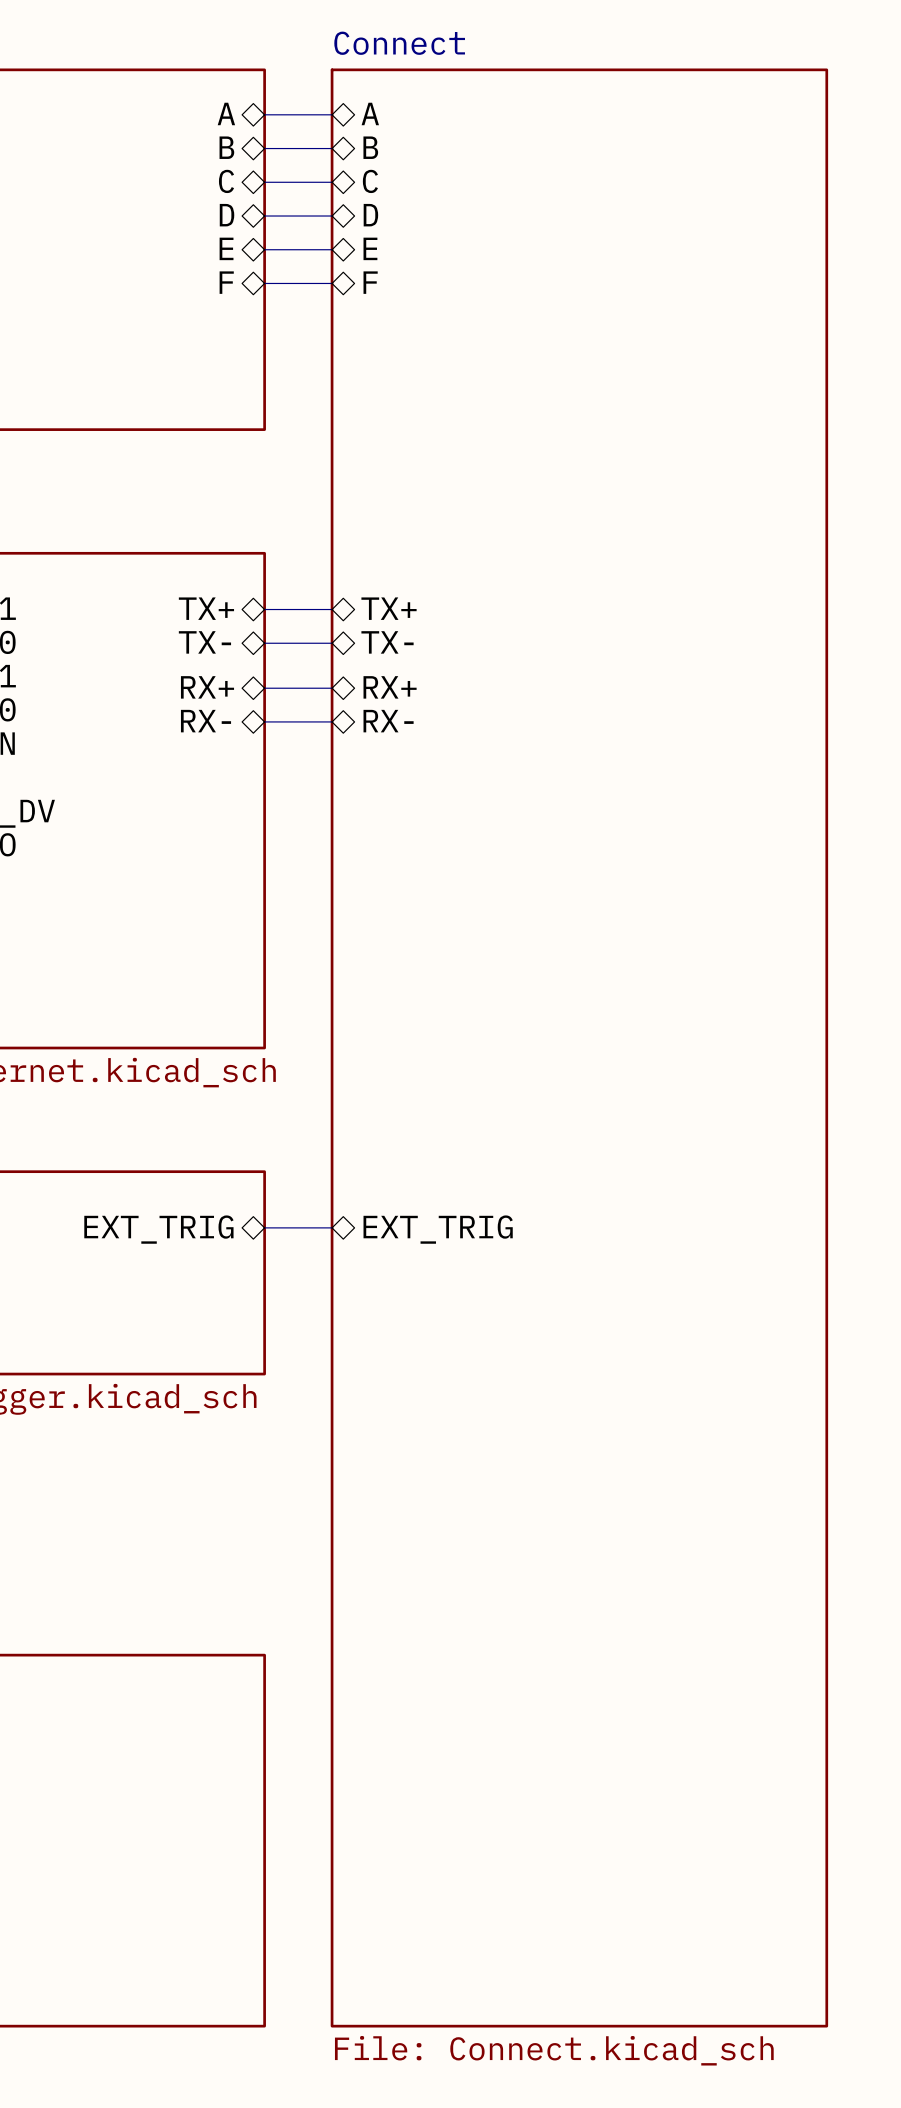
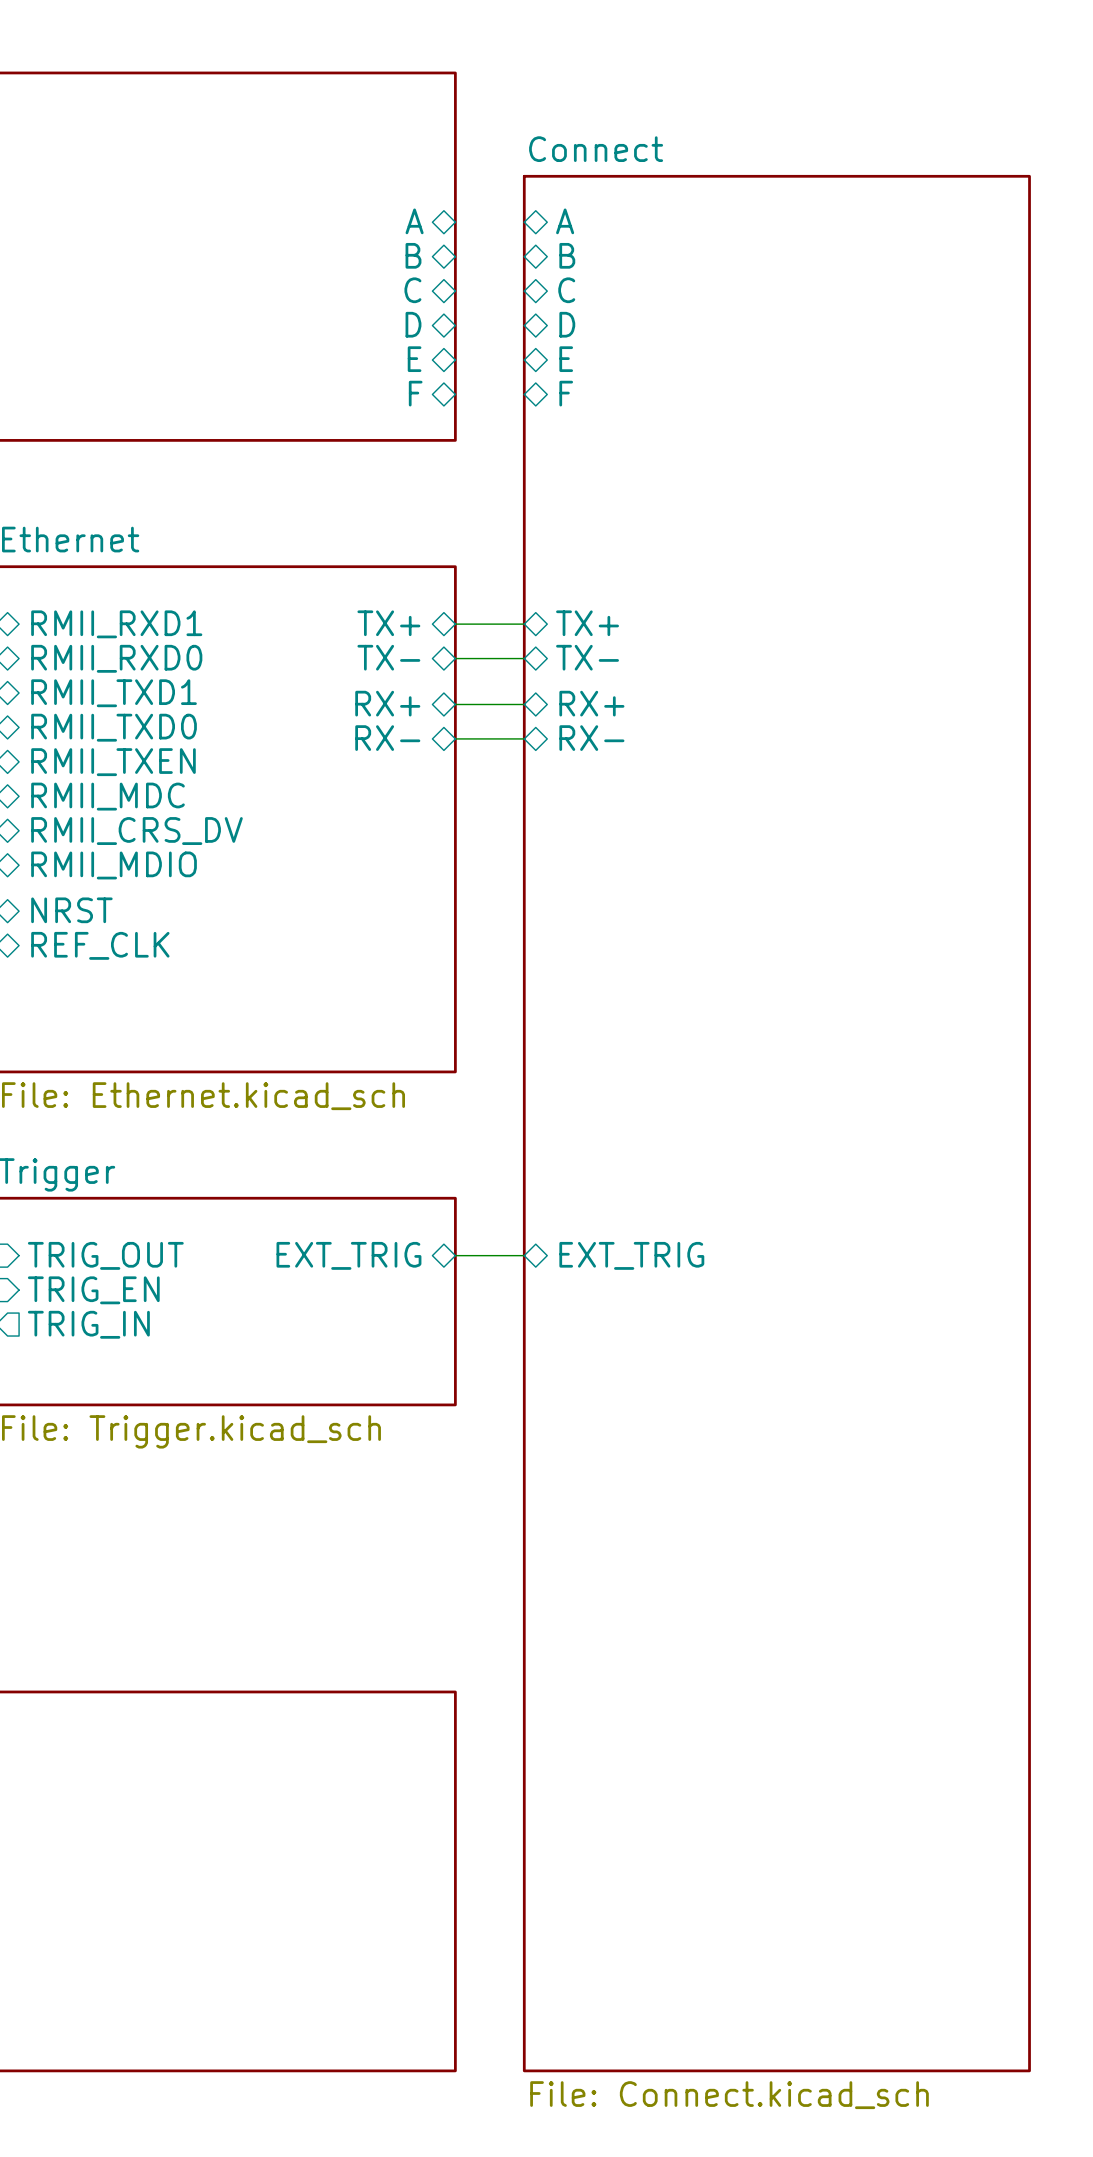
sheet pin: A (226, 113) -> none
sheet pin: A (370, 113) -> none
wire: (264, 114) (332, 114) -> none
sheet pin: B (226, 147) -> none
sheet pin: B (370, 147) -> none
wire: (264, 148) (332, 148) -> none
sheet pin: C (226, 181) -> none
sheet pin: C (370, 181) -> none
wire: (264, 182) (332, 182) -> none
sheet pin: D (227, 215) -> A (414, 221)
sheet pin: D (370, 215) -> A (565, 221)
wire: (264, 216) (332, 216) -> none
sheet pin: E (226, 248) -> B (413, 255)
sheet pin: E (370, 248) -> B (567, 255)
wire: (264, 249) (332, 249) -> none
sheet pin: F (226, 282) -> C (412, 290)
sheet pin: F (370, 282) -> C (566, 290)
wire: (264, 283) (332, 283) -> none
sheet pin: none -> D (413, 324)
sheet pin: none -> D (567, 324)
sheet pin: none -> E (414, 359)
sheet pin: none -> E (566, 359)
sheet pin: none -> F (415, 393)
sheet pin: none -> F (566, 393)
sheet Connect: File: Connect.kicad_sch (579, 1048) -> none
sheet Connect: none -> File: Connect.kicad_sch (776, 1123)

